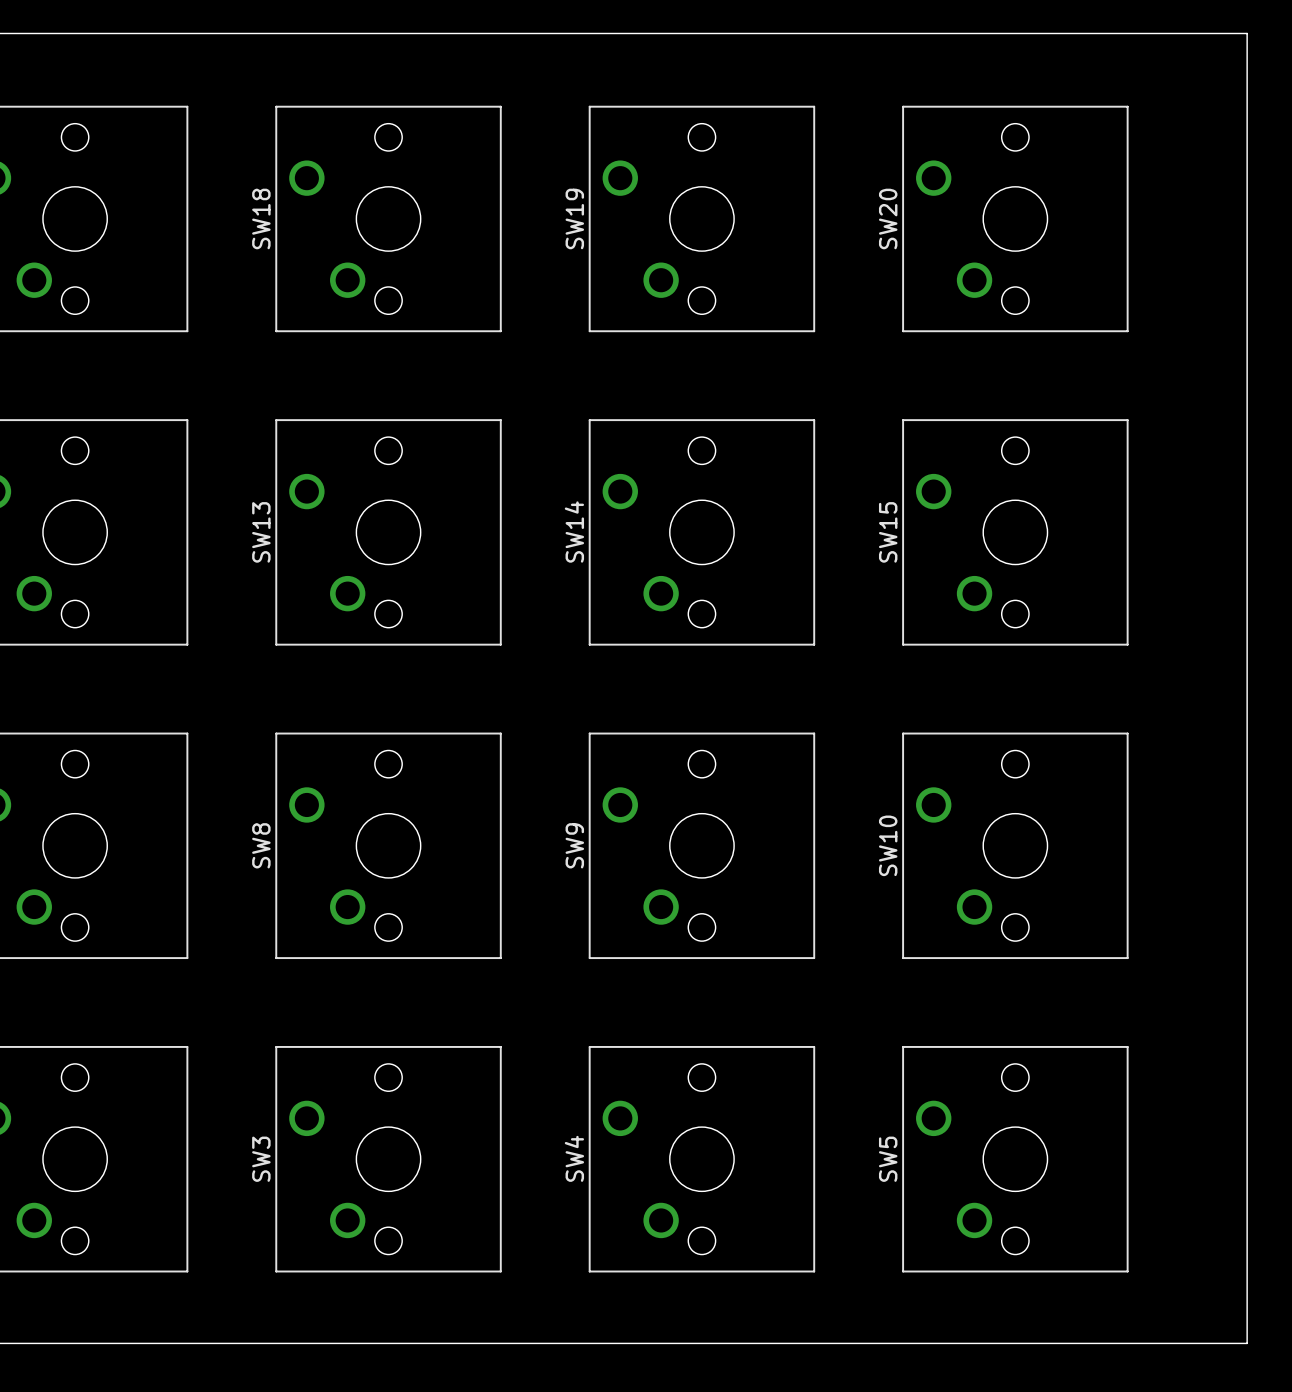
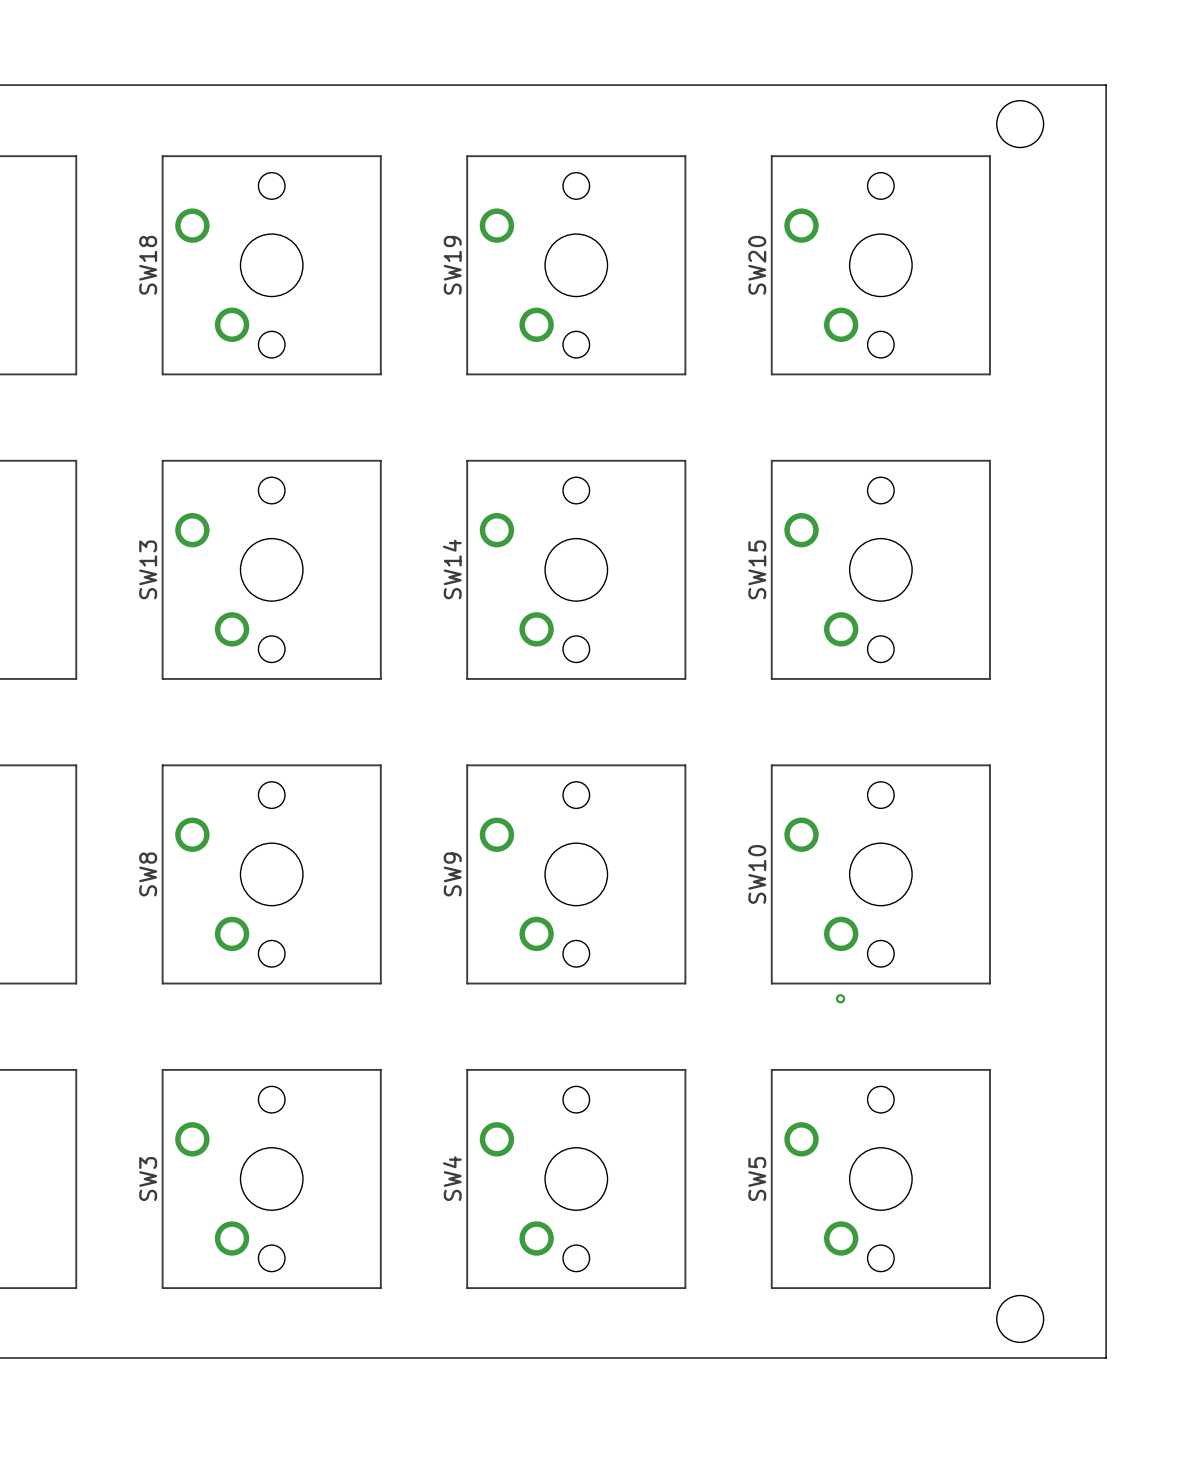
round board edge: none -> [996, 100, 1045, 148]
via: none -> (840, 998)
round board edge: none -> [996, 1295, 1045, 1343]

